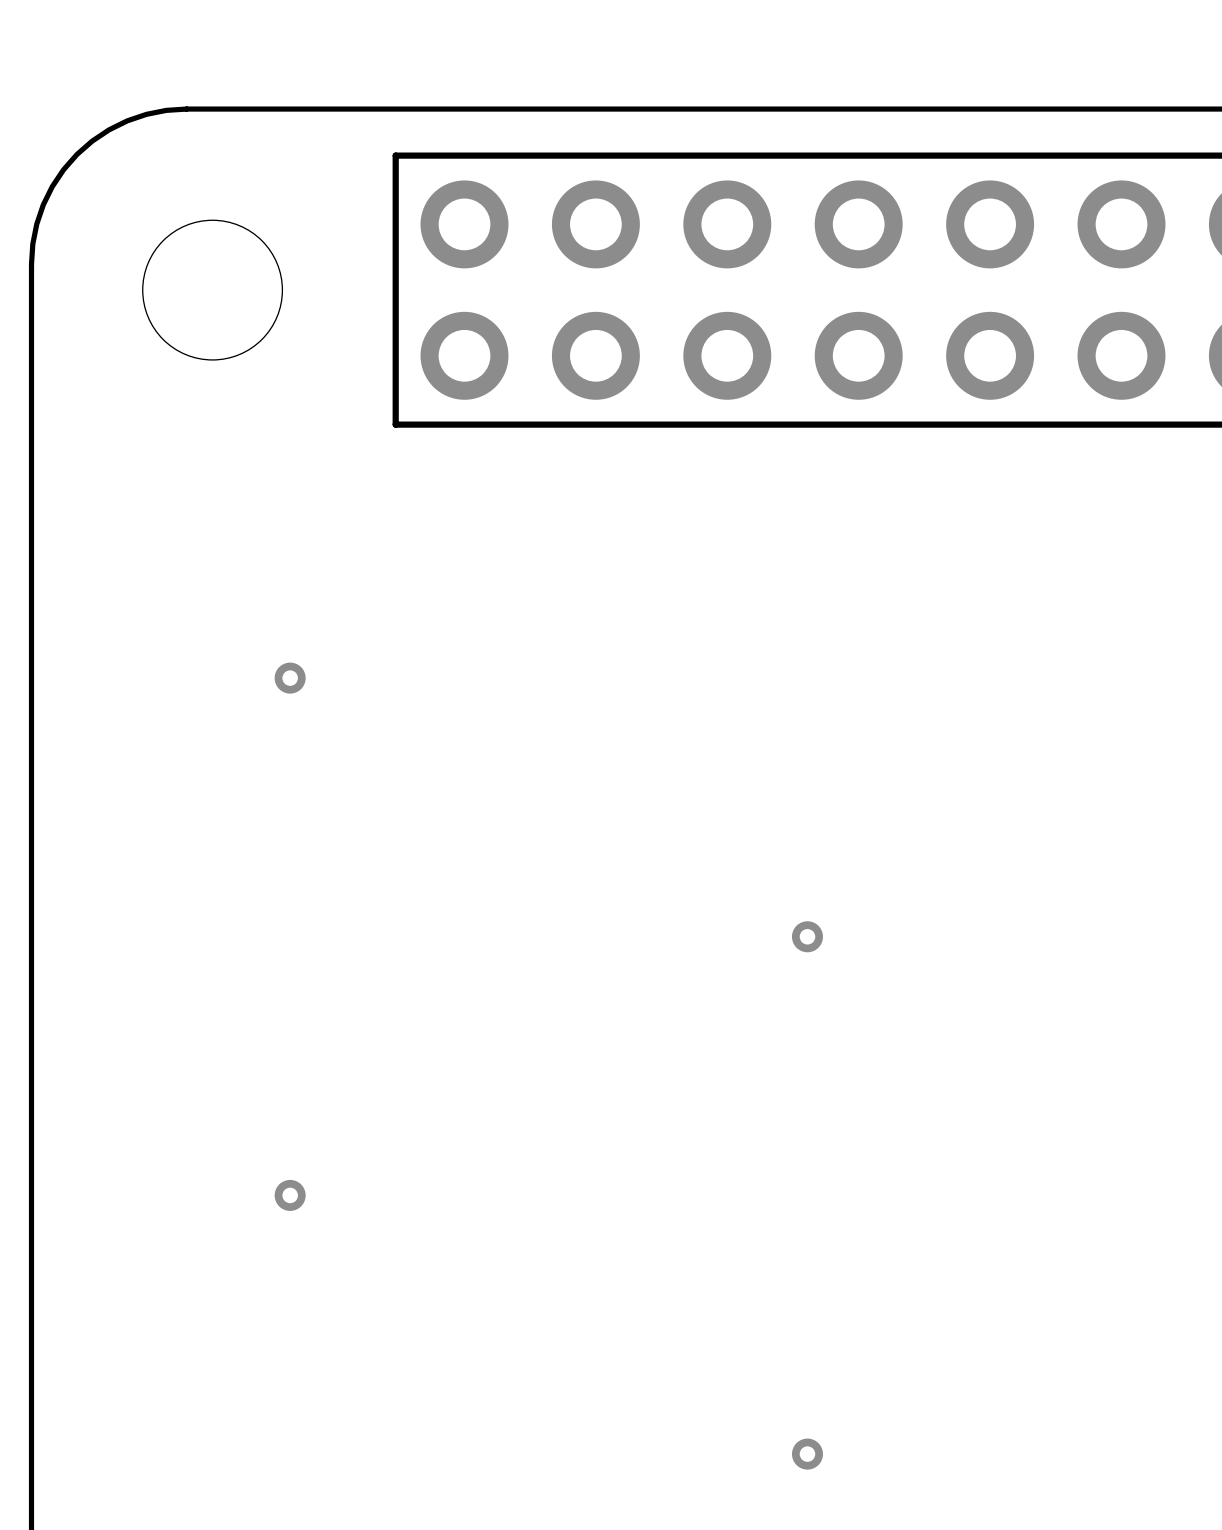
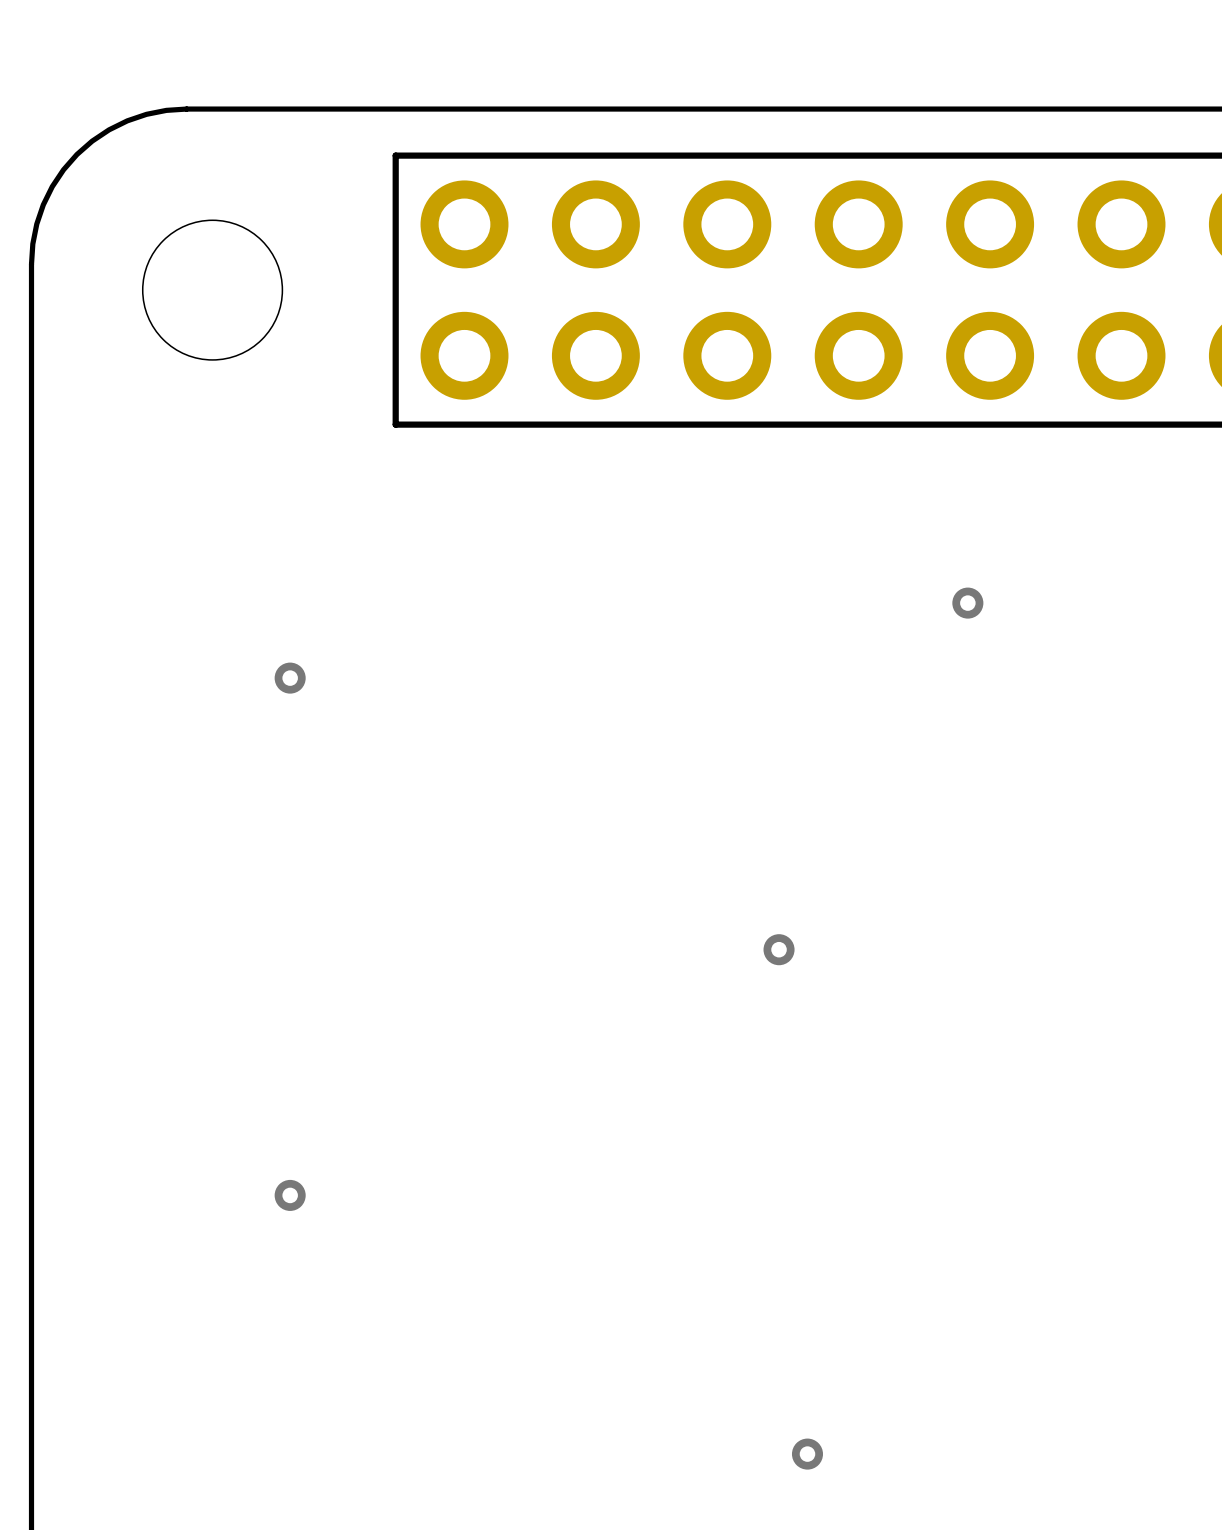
via: none -> (967, 603)
via position: (807, 936) -> (779, 949)

